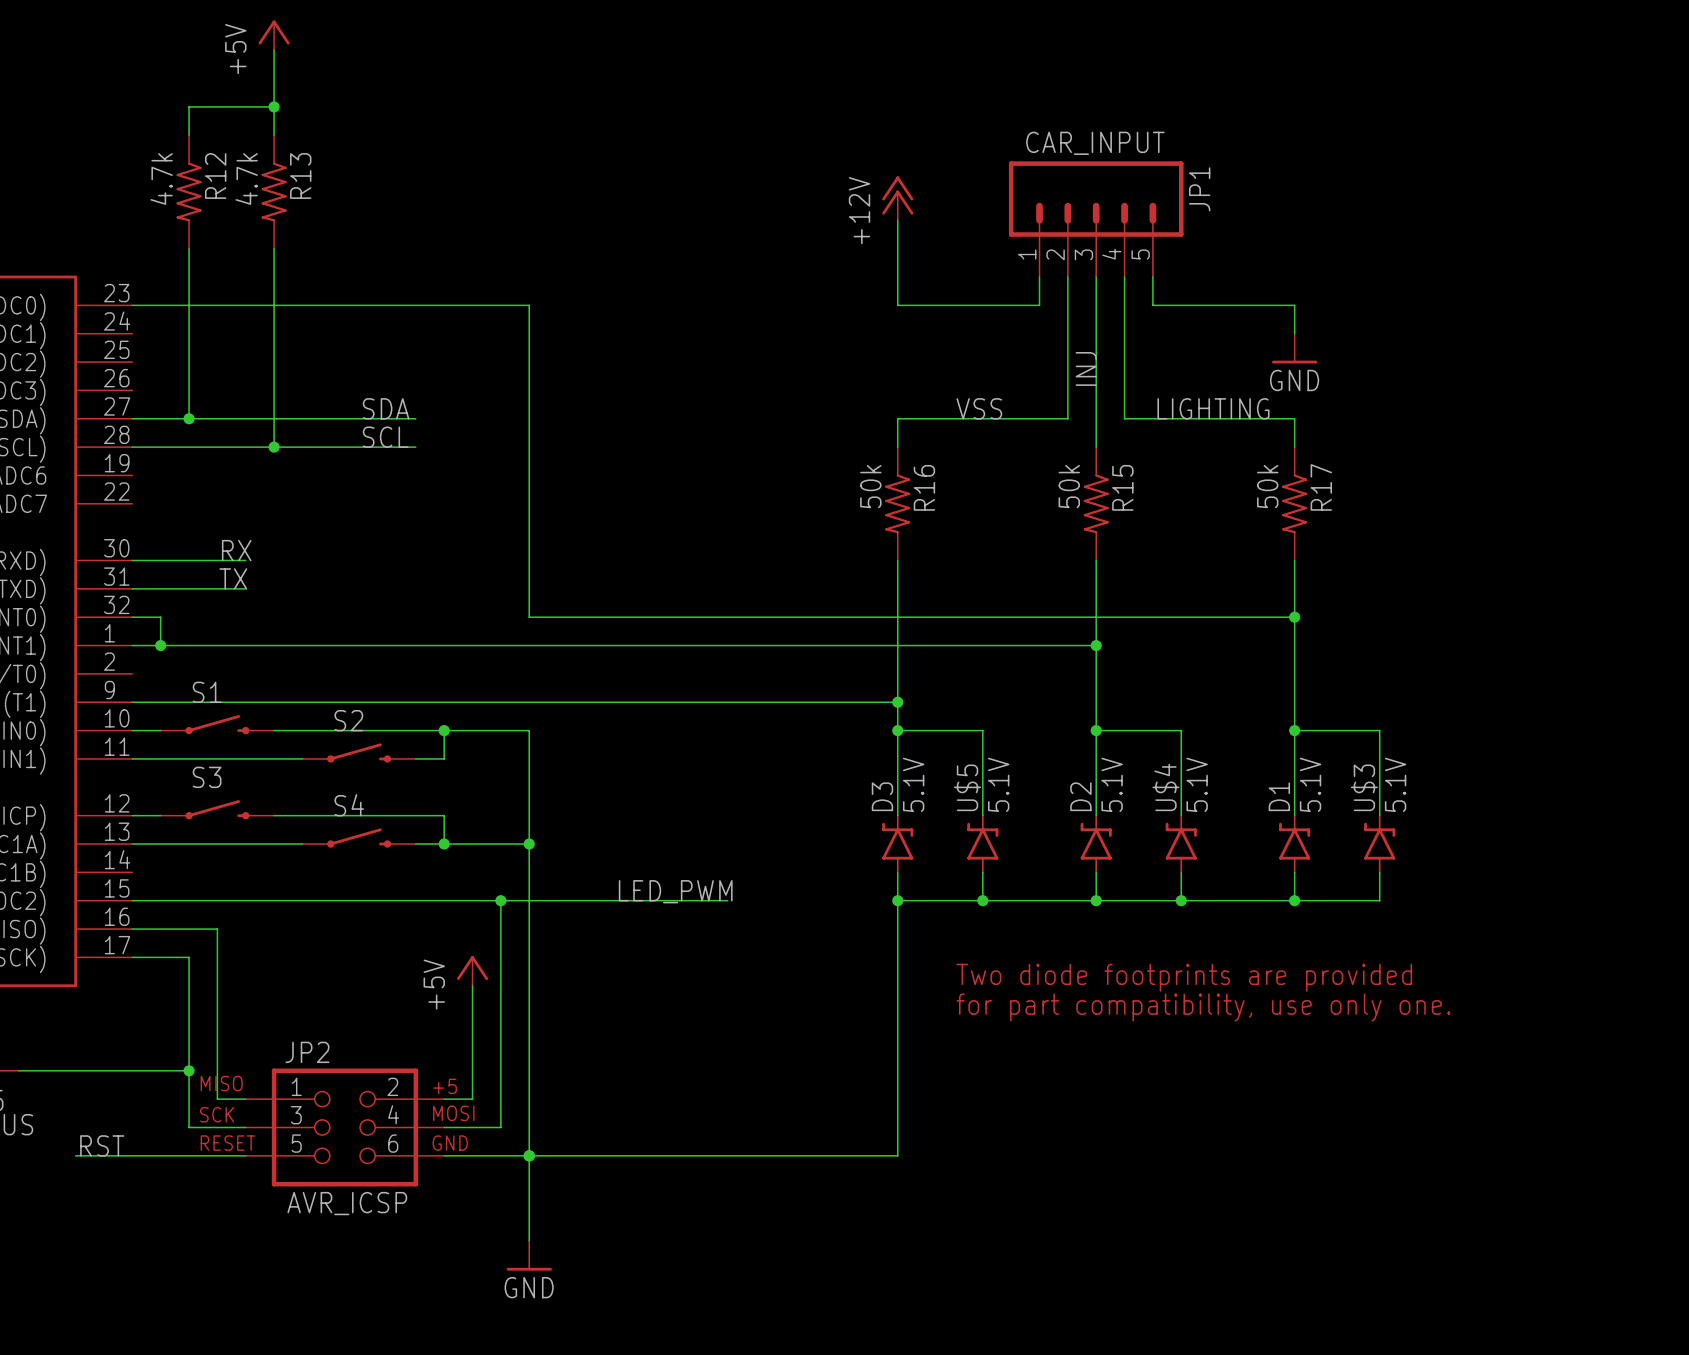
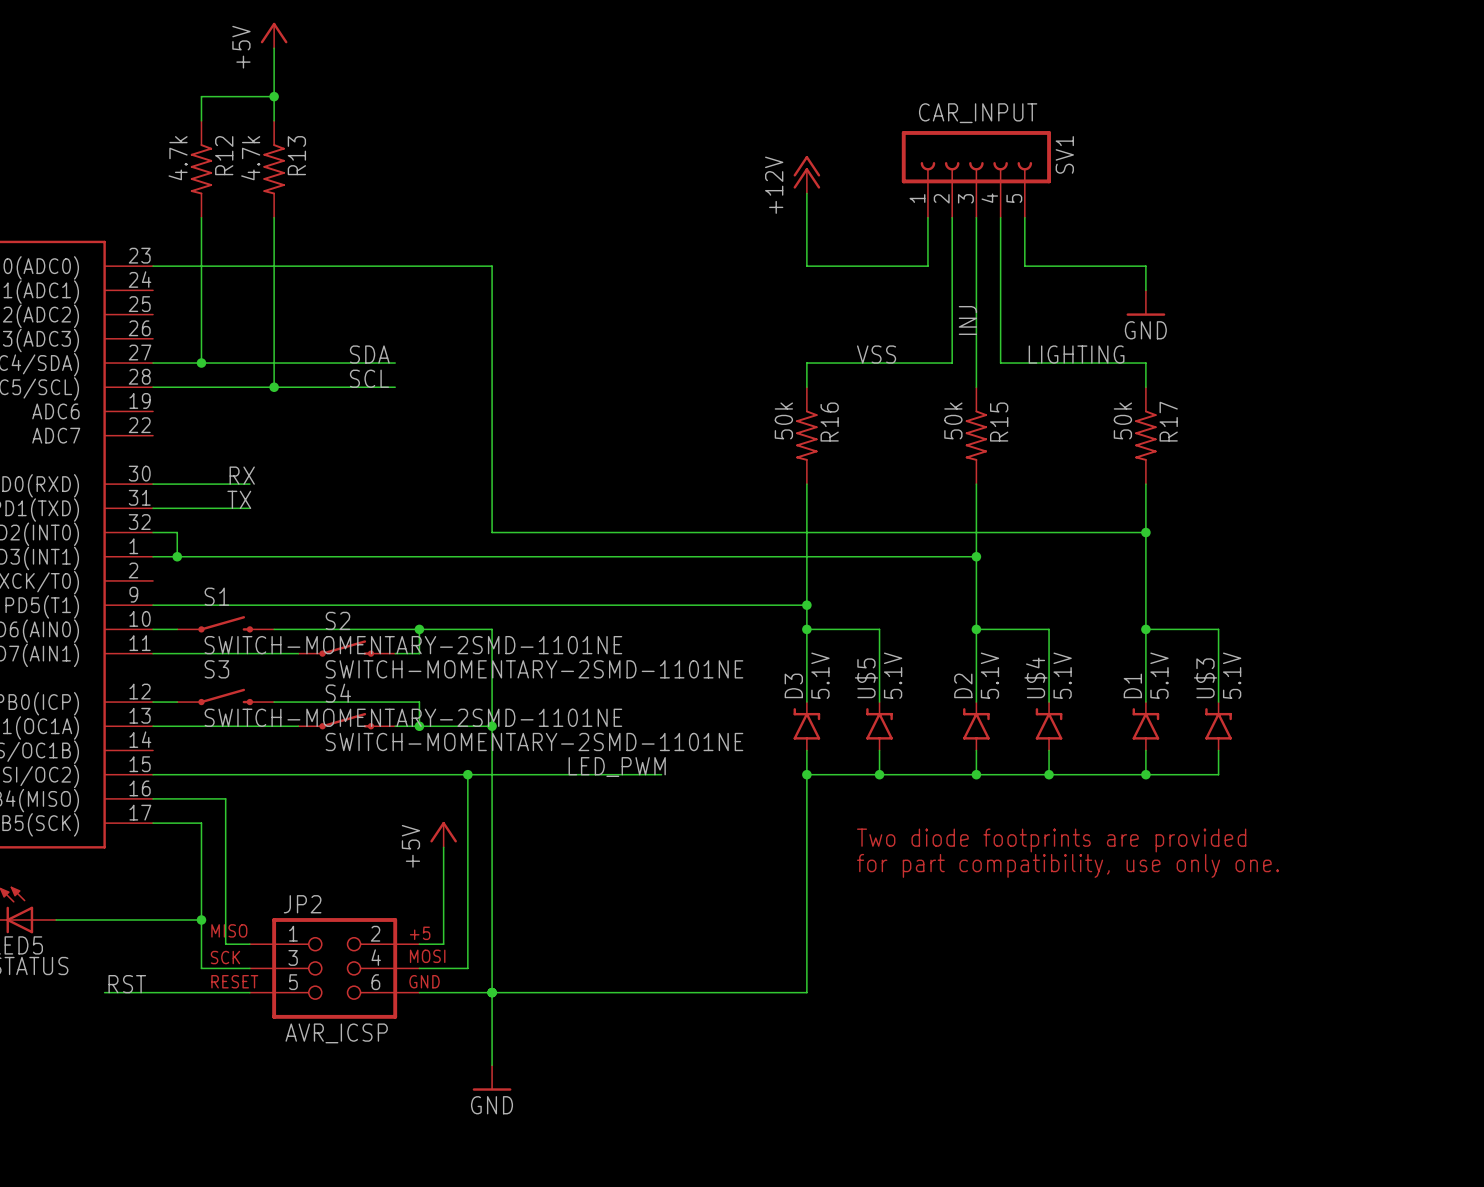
SV1: none -> CAR_INPUT (976, 174)
JP1: CAR_INPUT (1096, 219) -> none
S1 value: none -> SWITCH-MOMENTARY-2SMD-1101NE (413, 645)
S2 value: none -> SWITCH-MOMENTARY-2SMD-1101NE (534, 669)
S3 value: none -> SWITCH-MOMENTARY-2SMD-1101NE (413, 717)
S4 value: none -> SWITCH-MOMENTARY-2SMD-1101NE (534, 742)

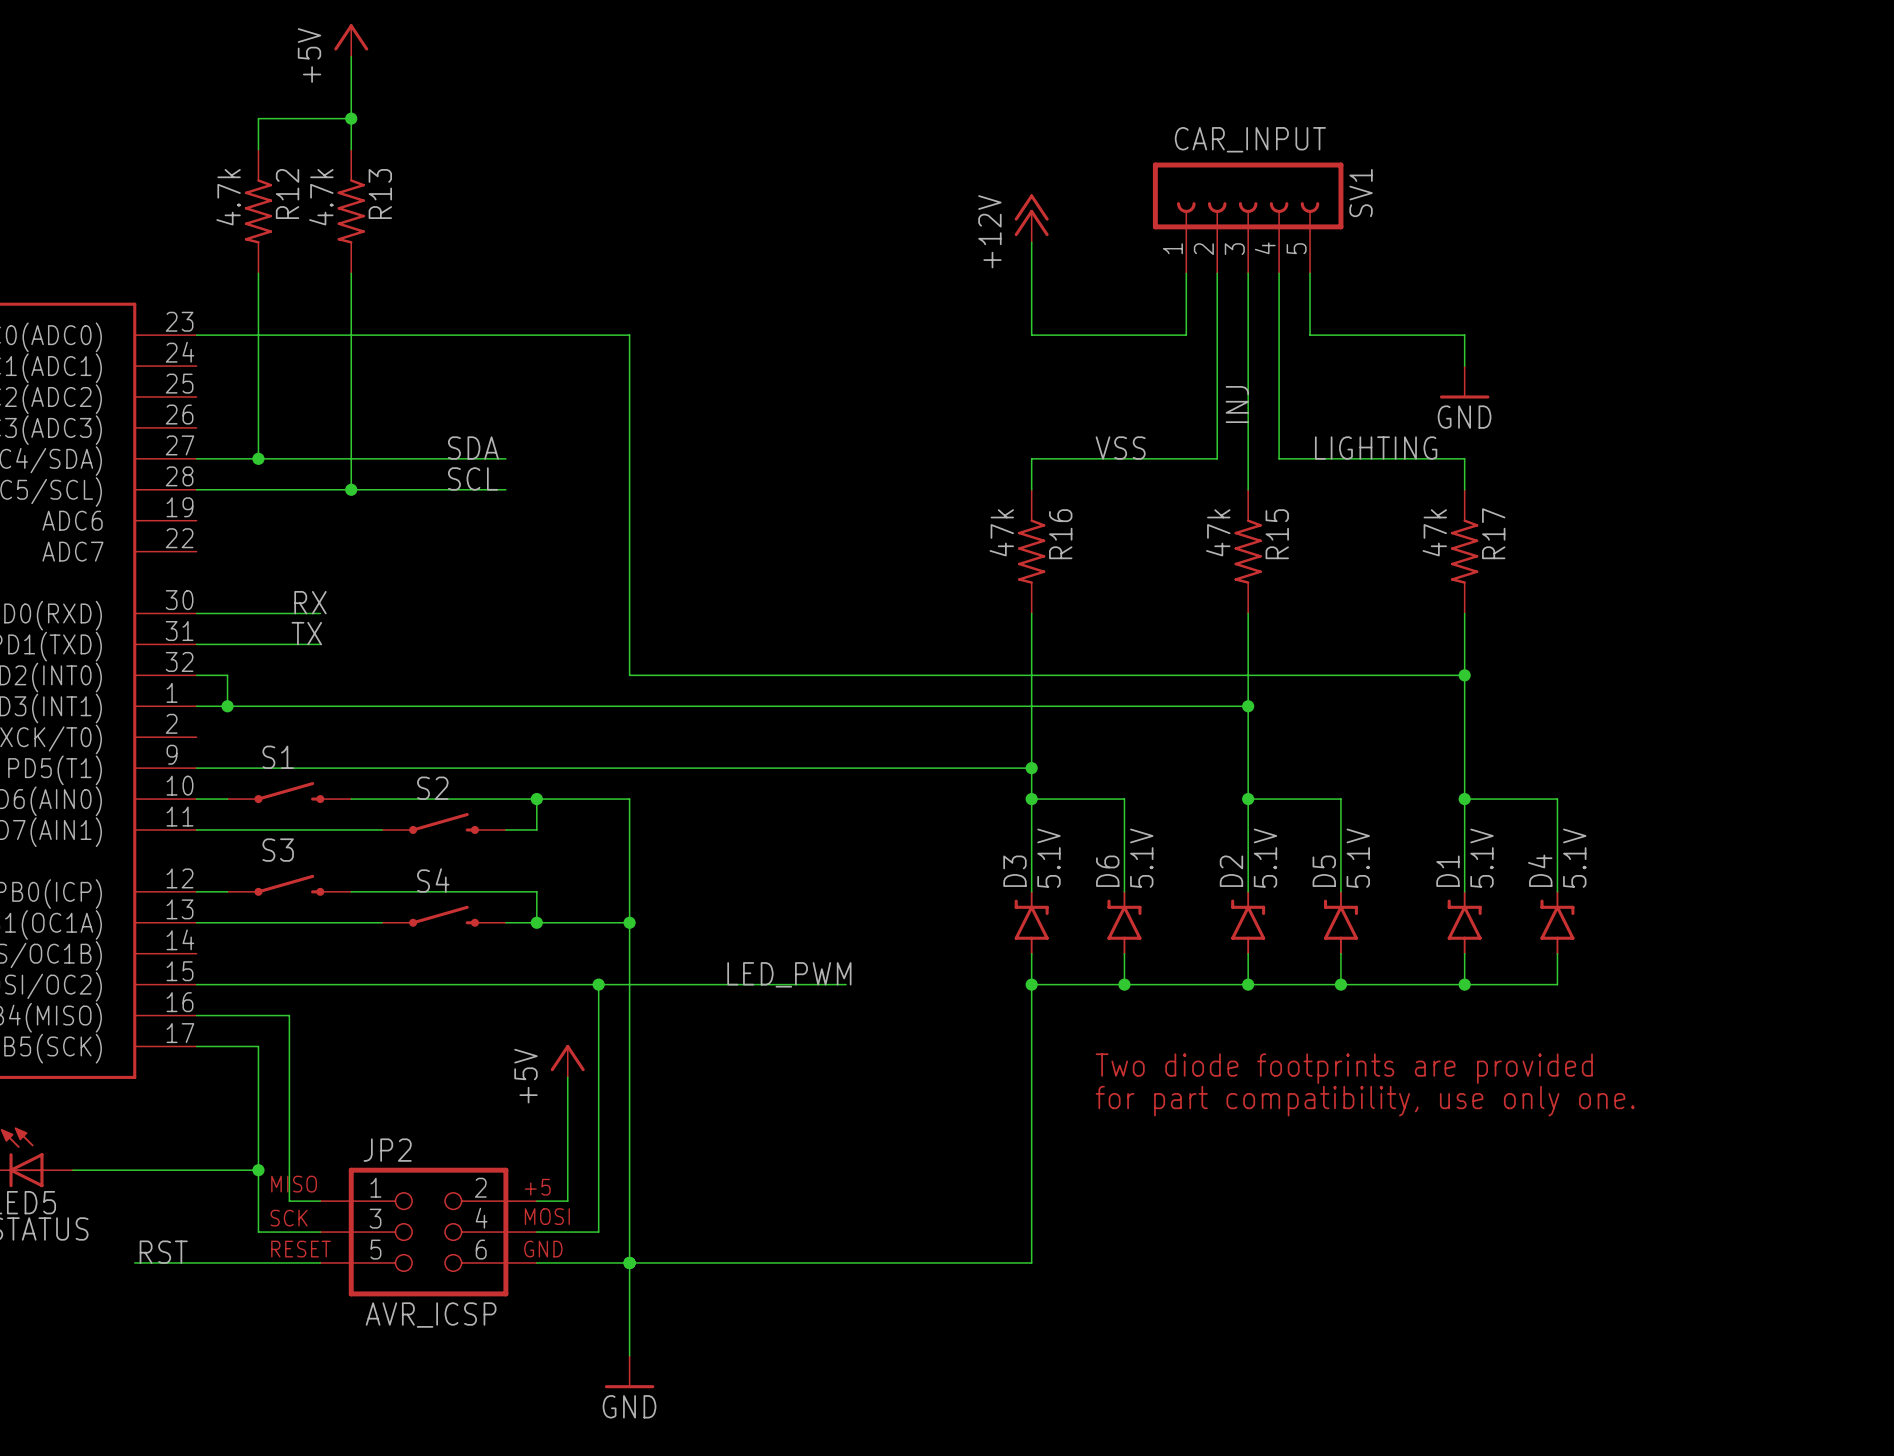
R16 value: 50k (783, 420) -> 47k (1001, 532)
R15 value: 50k (953, 420) -> 47k (1218, 532)
R17 value: 50k (1122, 420) -> 47k (1434, 532)
S1 value: SWITCH-MOMENTARY-2SMD-1101NE (413, 645) -> none
S2 value: SWITCH-MOMENTARY-2SMD-1101NE (534, 669) -> none
U$4 name: U$4 (1035, 677) -> D5 (1324, 871)
U$5 name: U$5 (866, 678) -> D6 (1107, 871)
U$3 name: U$3 (1205, 678) -> D4 (1540, 870)
S3 value: SWITCH-MOMENTARY-2SMD-1101NE (413, 717) -> none
S4 value: SWITCH-MOMENTARY-2SMD-1101NE (534, 742) -> none

